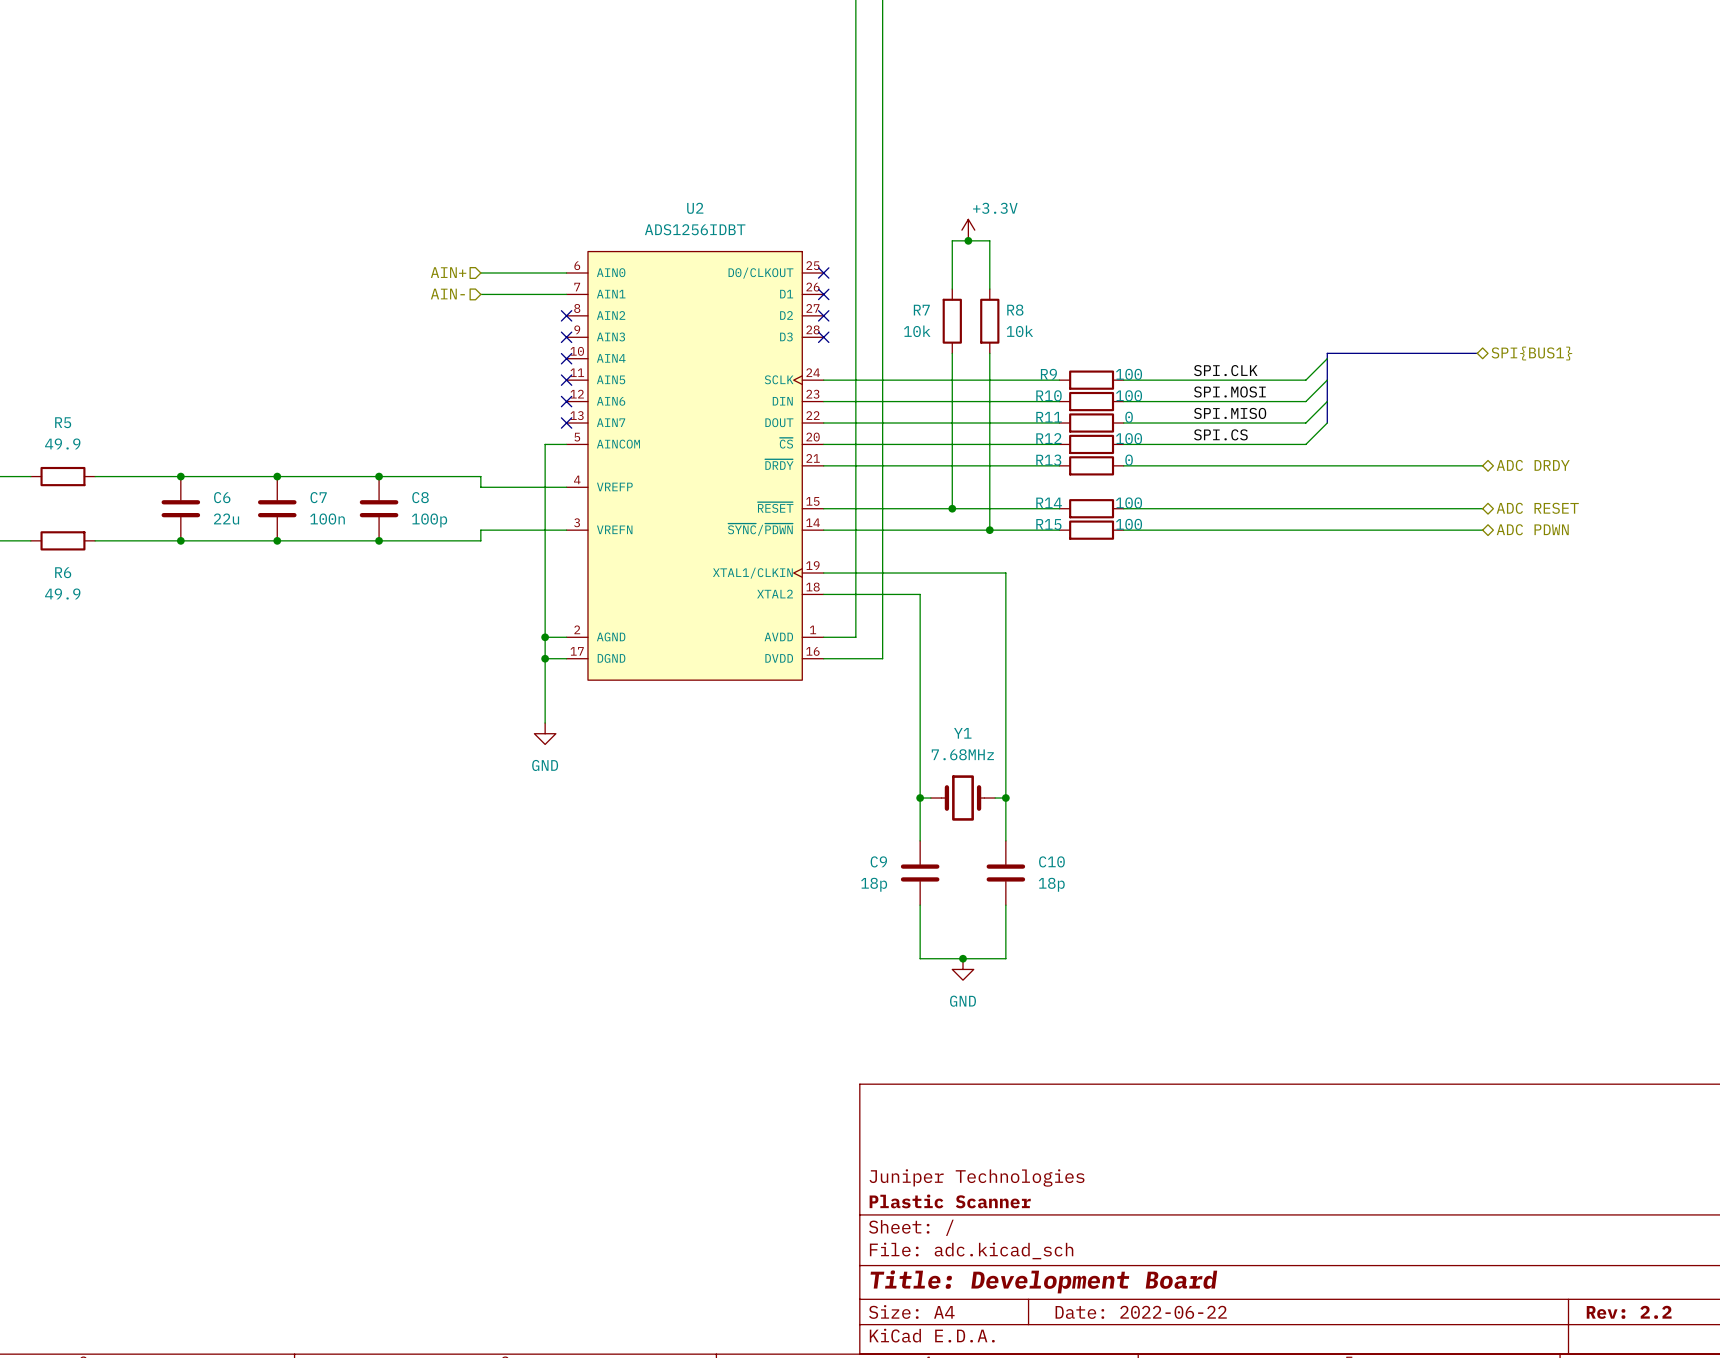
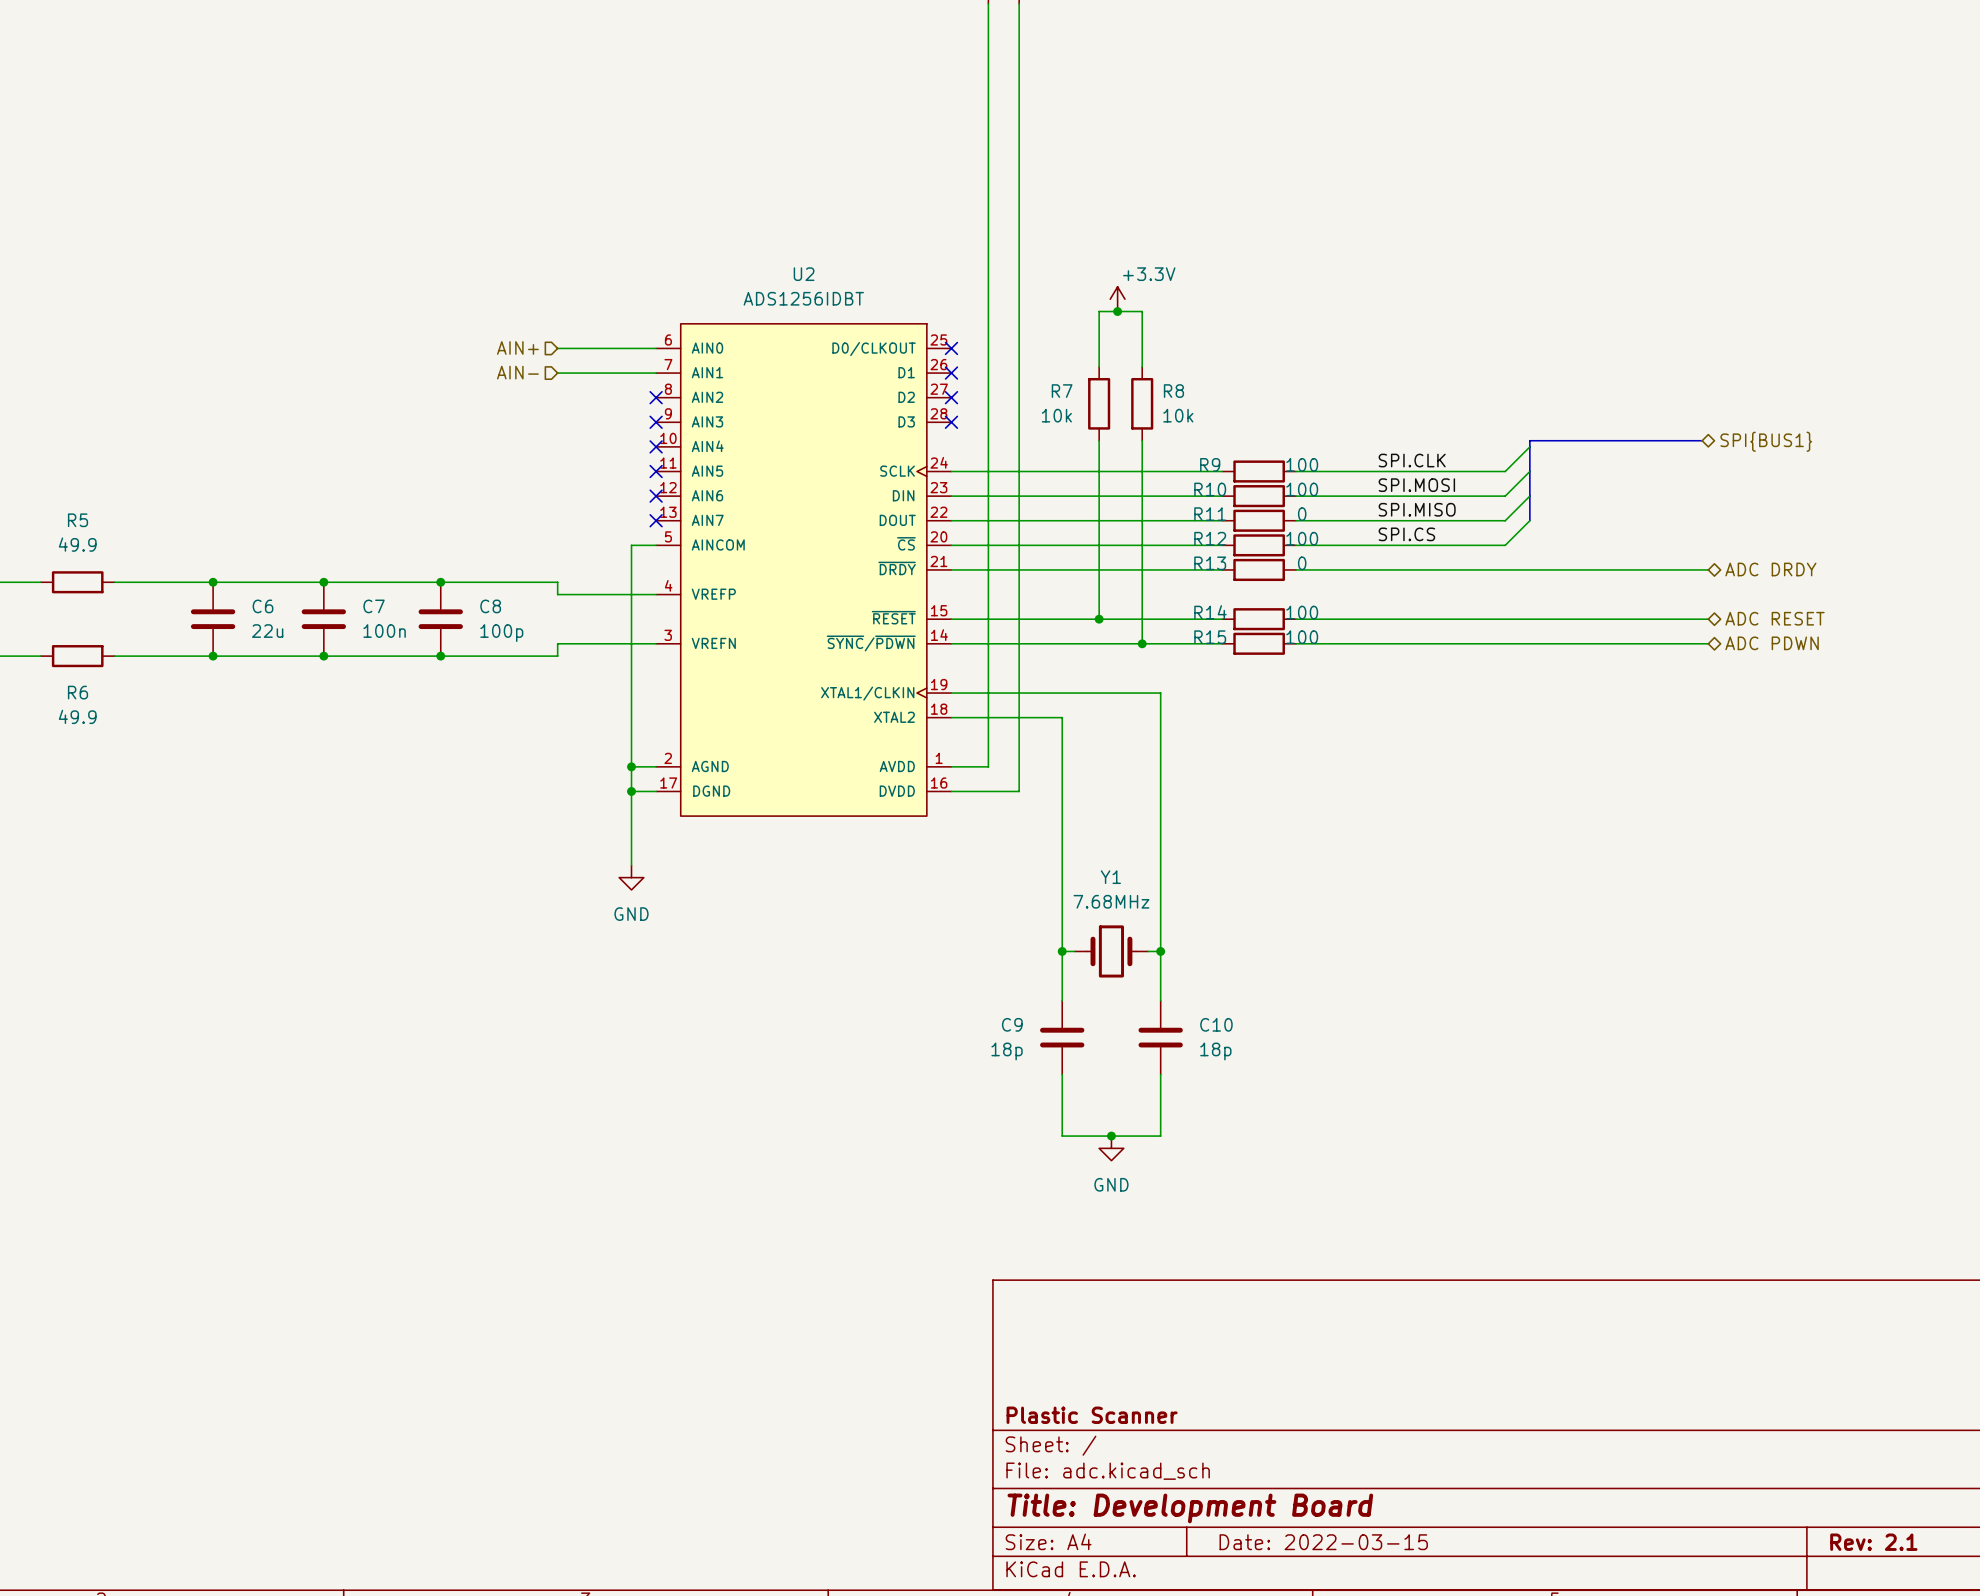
title block: Juniper Technologies (977, 1177) -> none
title block: Date: 2022-06-22 (1141, 1312) -> Date: 2022-03-15 (1323, 1542)
title block: Rev: 2.2 (1629, 1312) -> Rev: 2.1 (1873, 1542)

